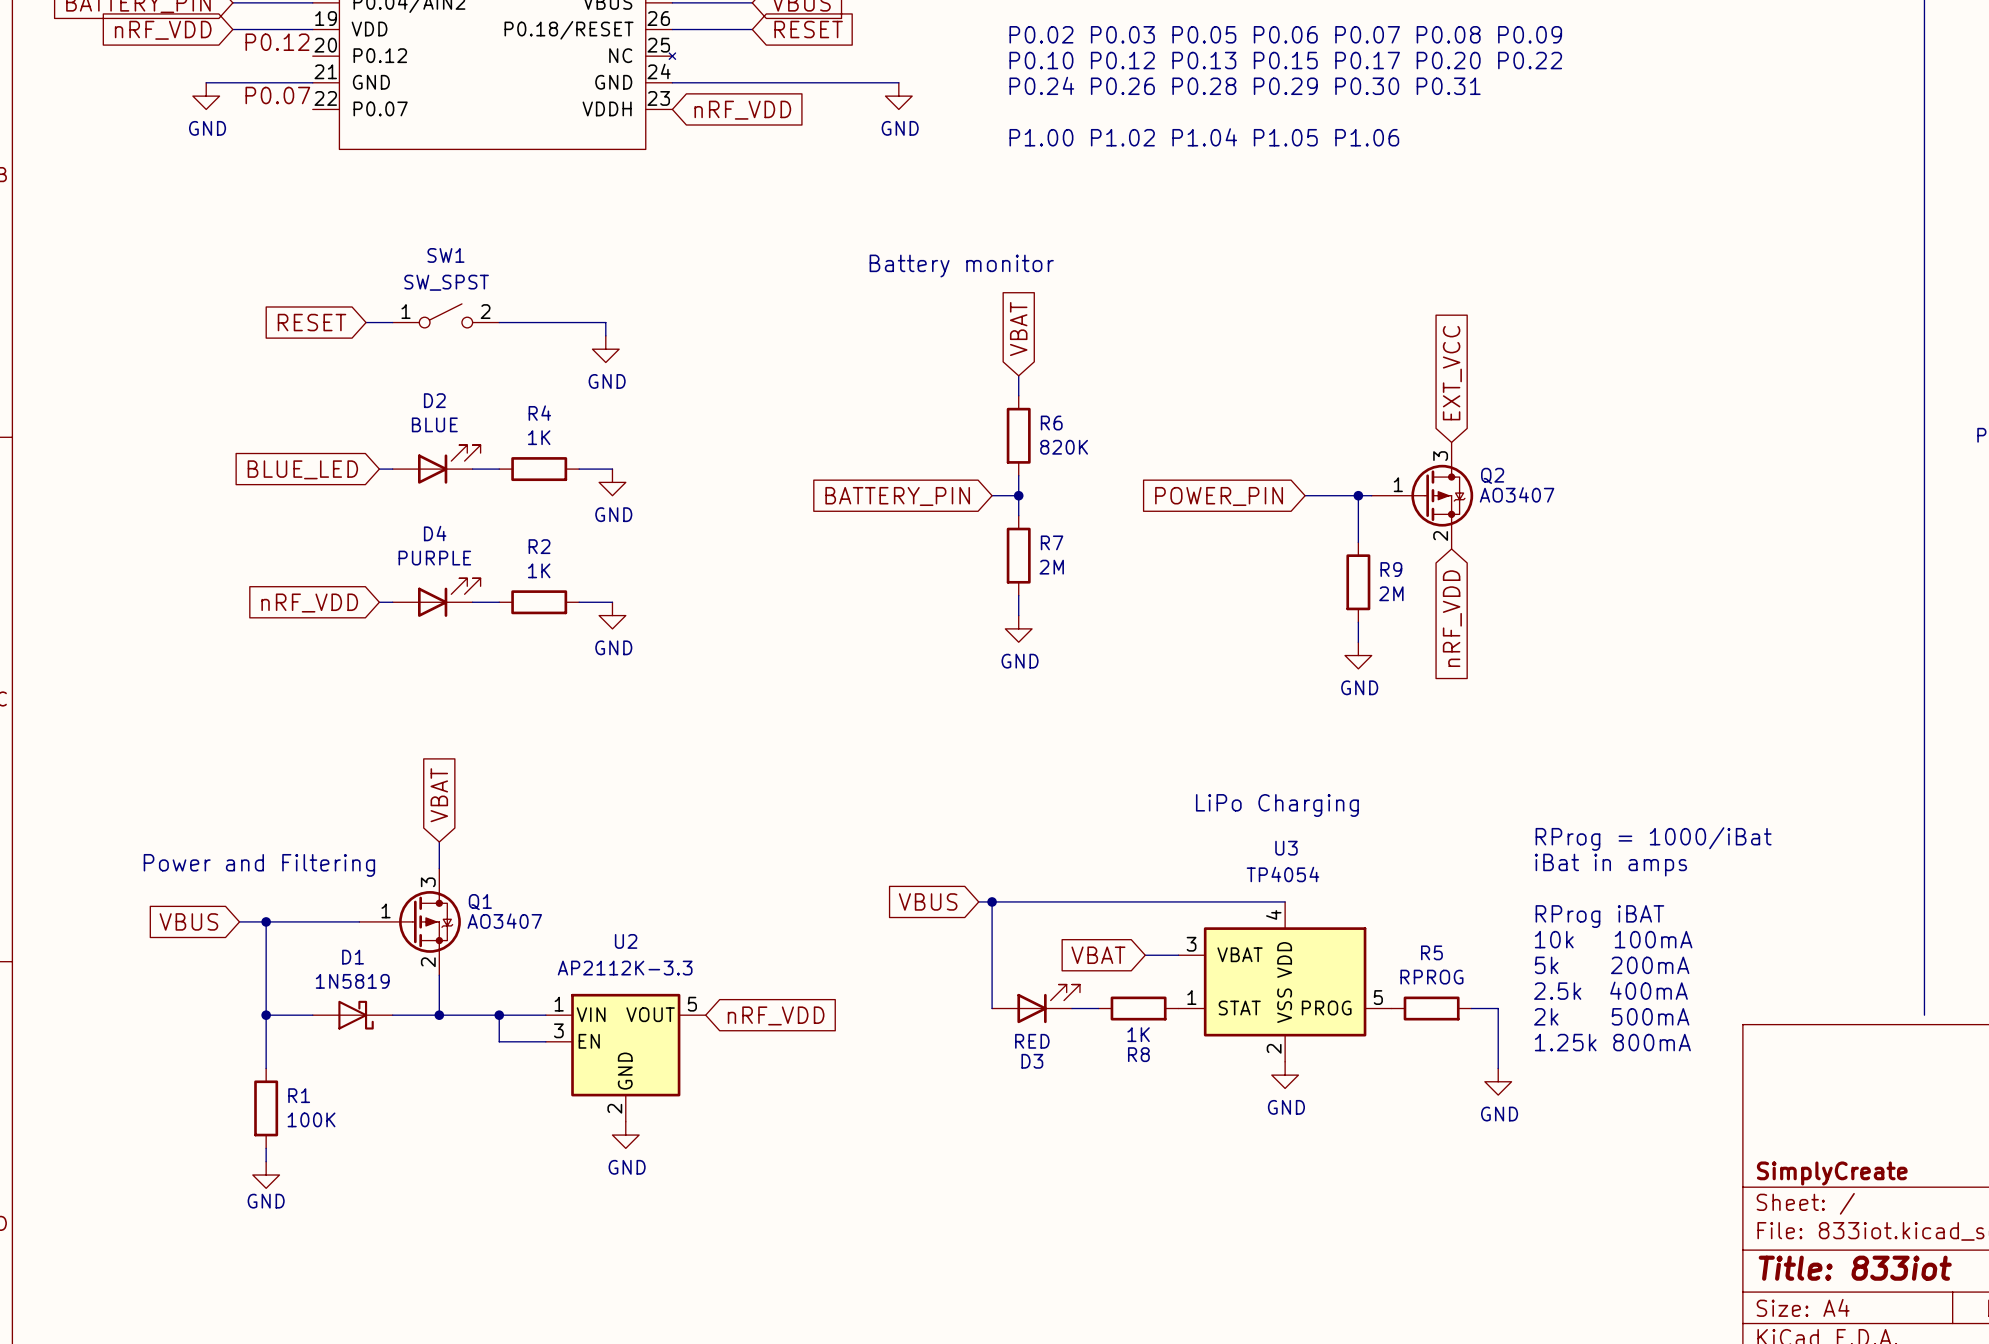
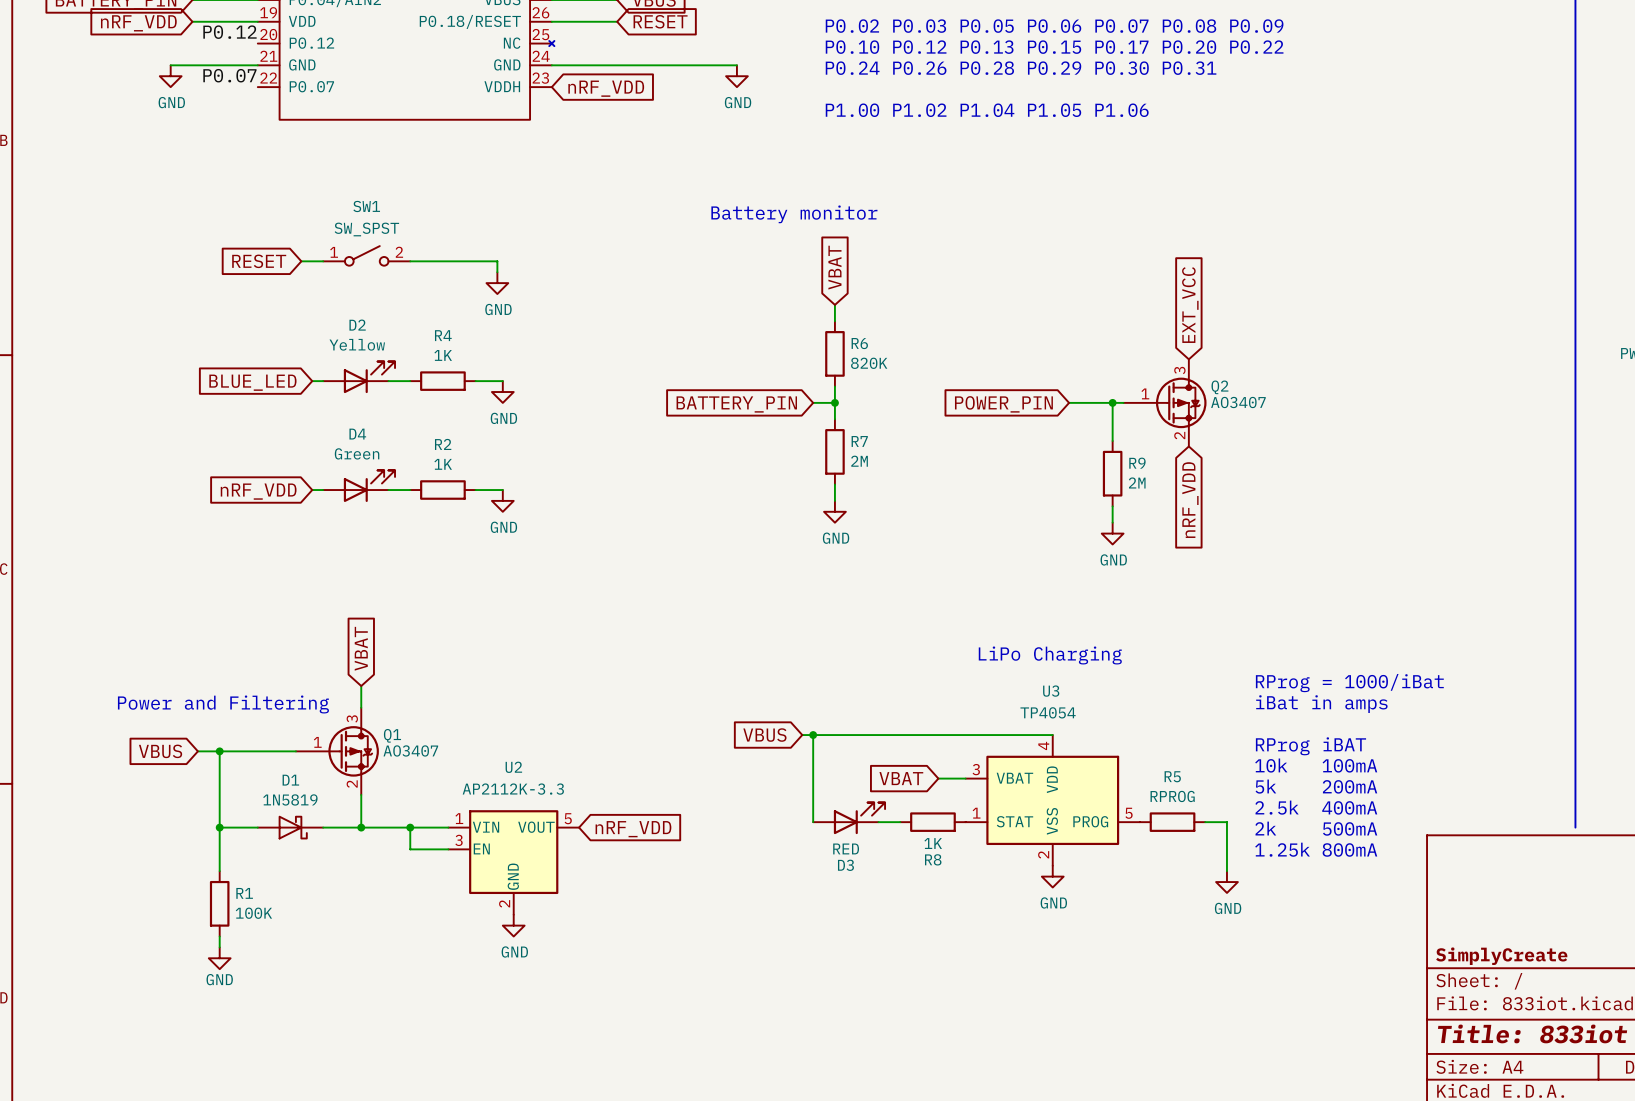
D2 value: BLUE (434, 424) -> Yellow (357, 344)
D4 value: PURPLE (434, 558) -> Green (357, 453)

